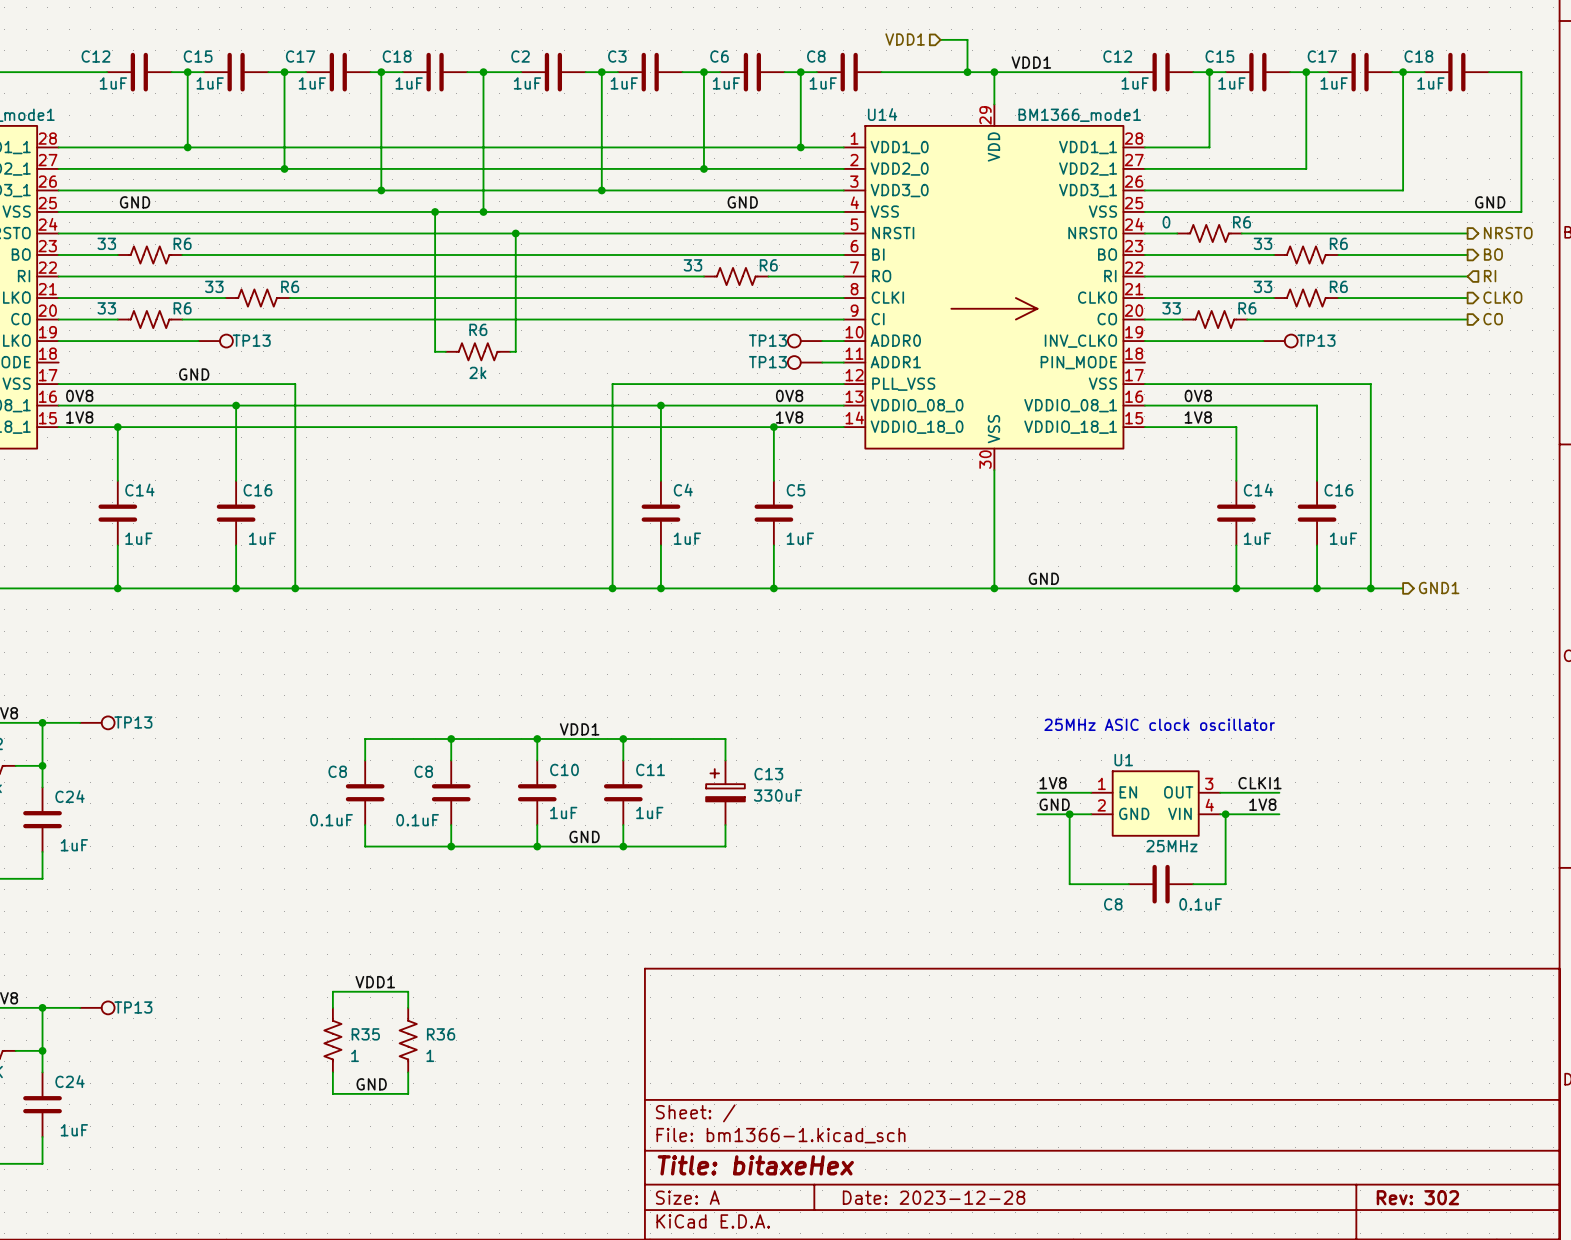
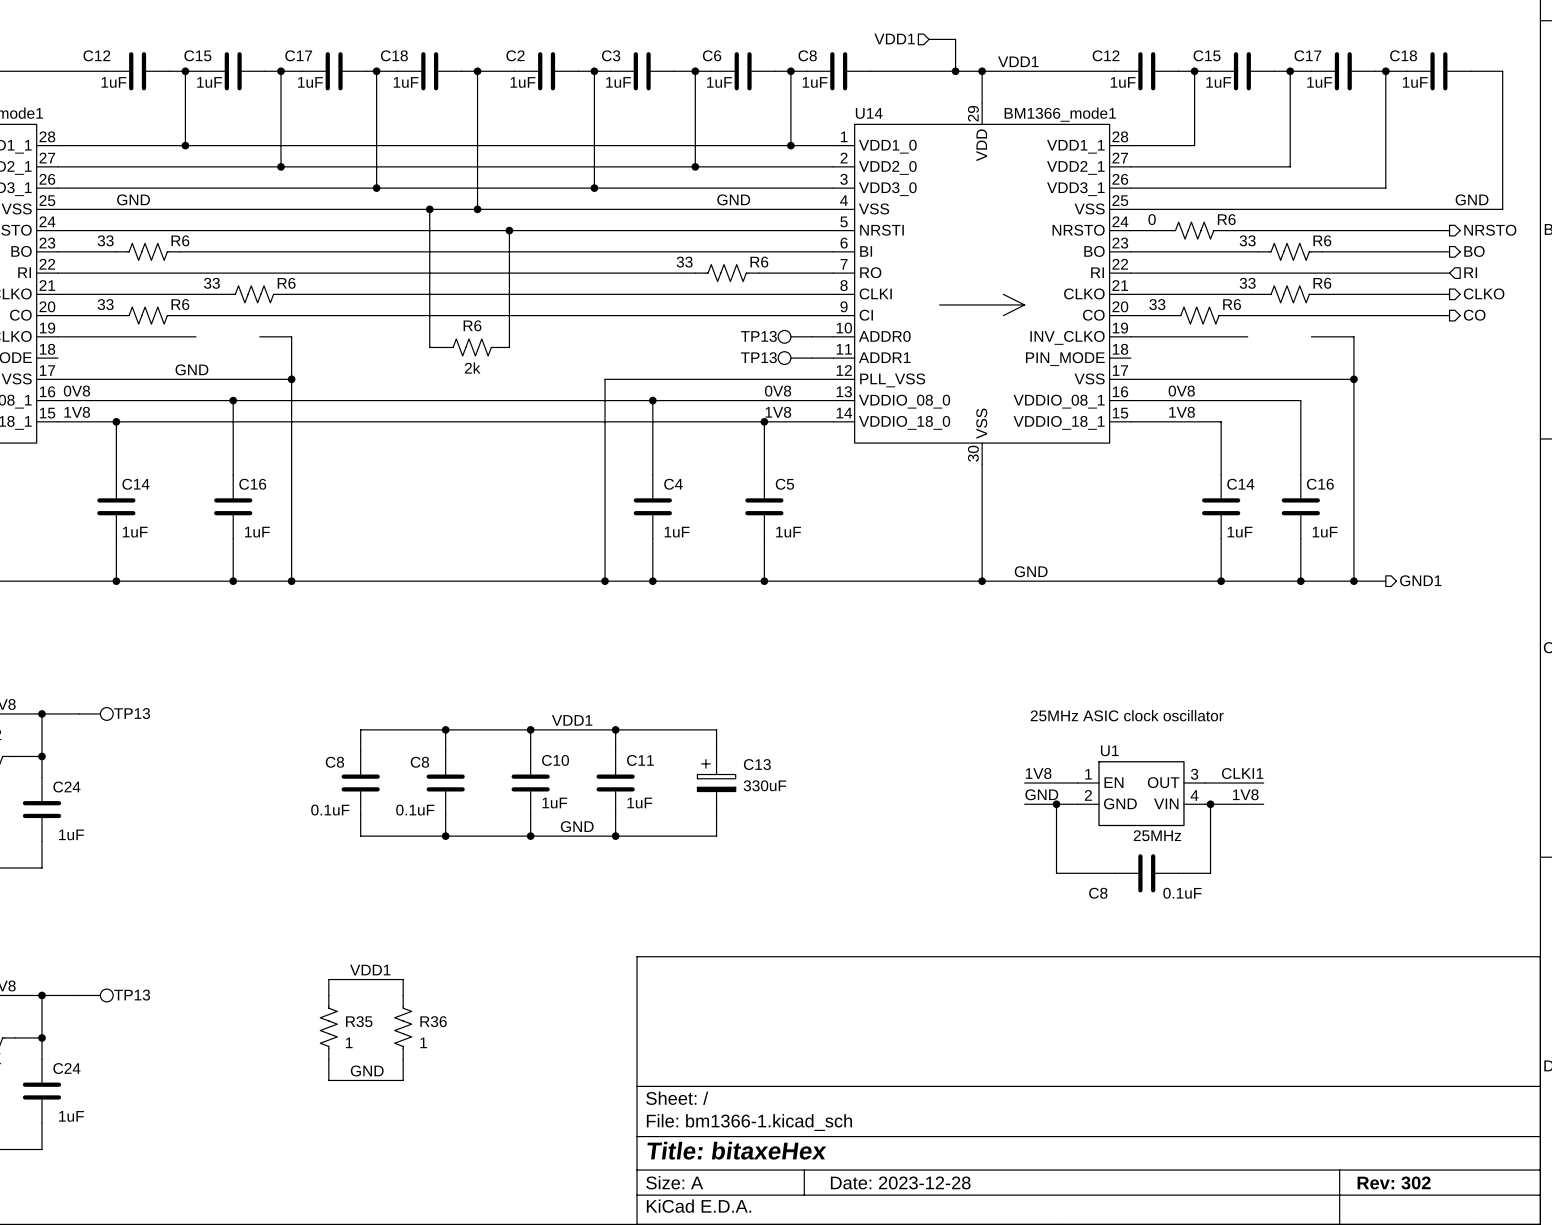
TP13: (215, 341) -> none
wire: none -> (259, 336) (291, 336) (291, 379)
TP13: (1280, 341) -> none
wire: none -> (1311, 336) (1353, 336) (1353, 379)
junction: none -> (291, 379)
junction: none -> (1353, 379)

